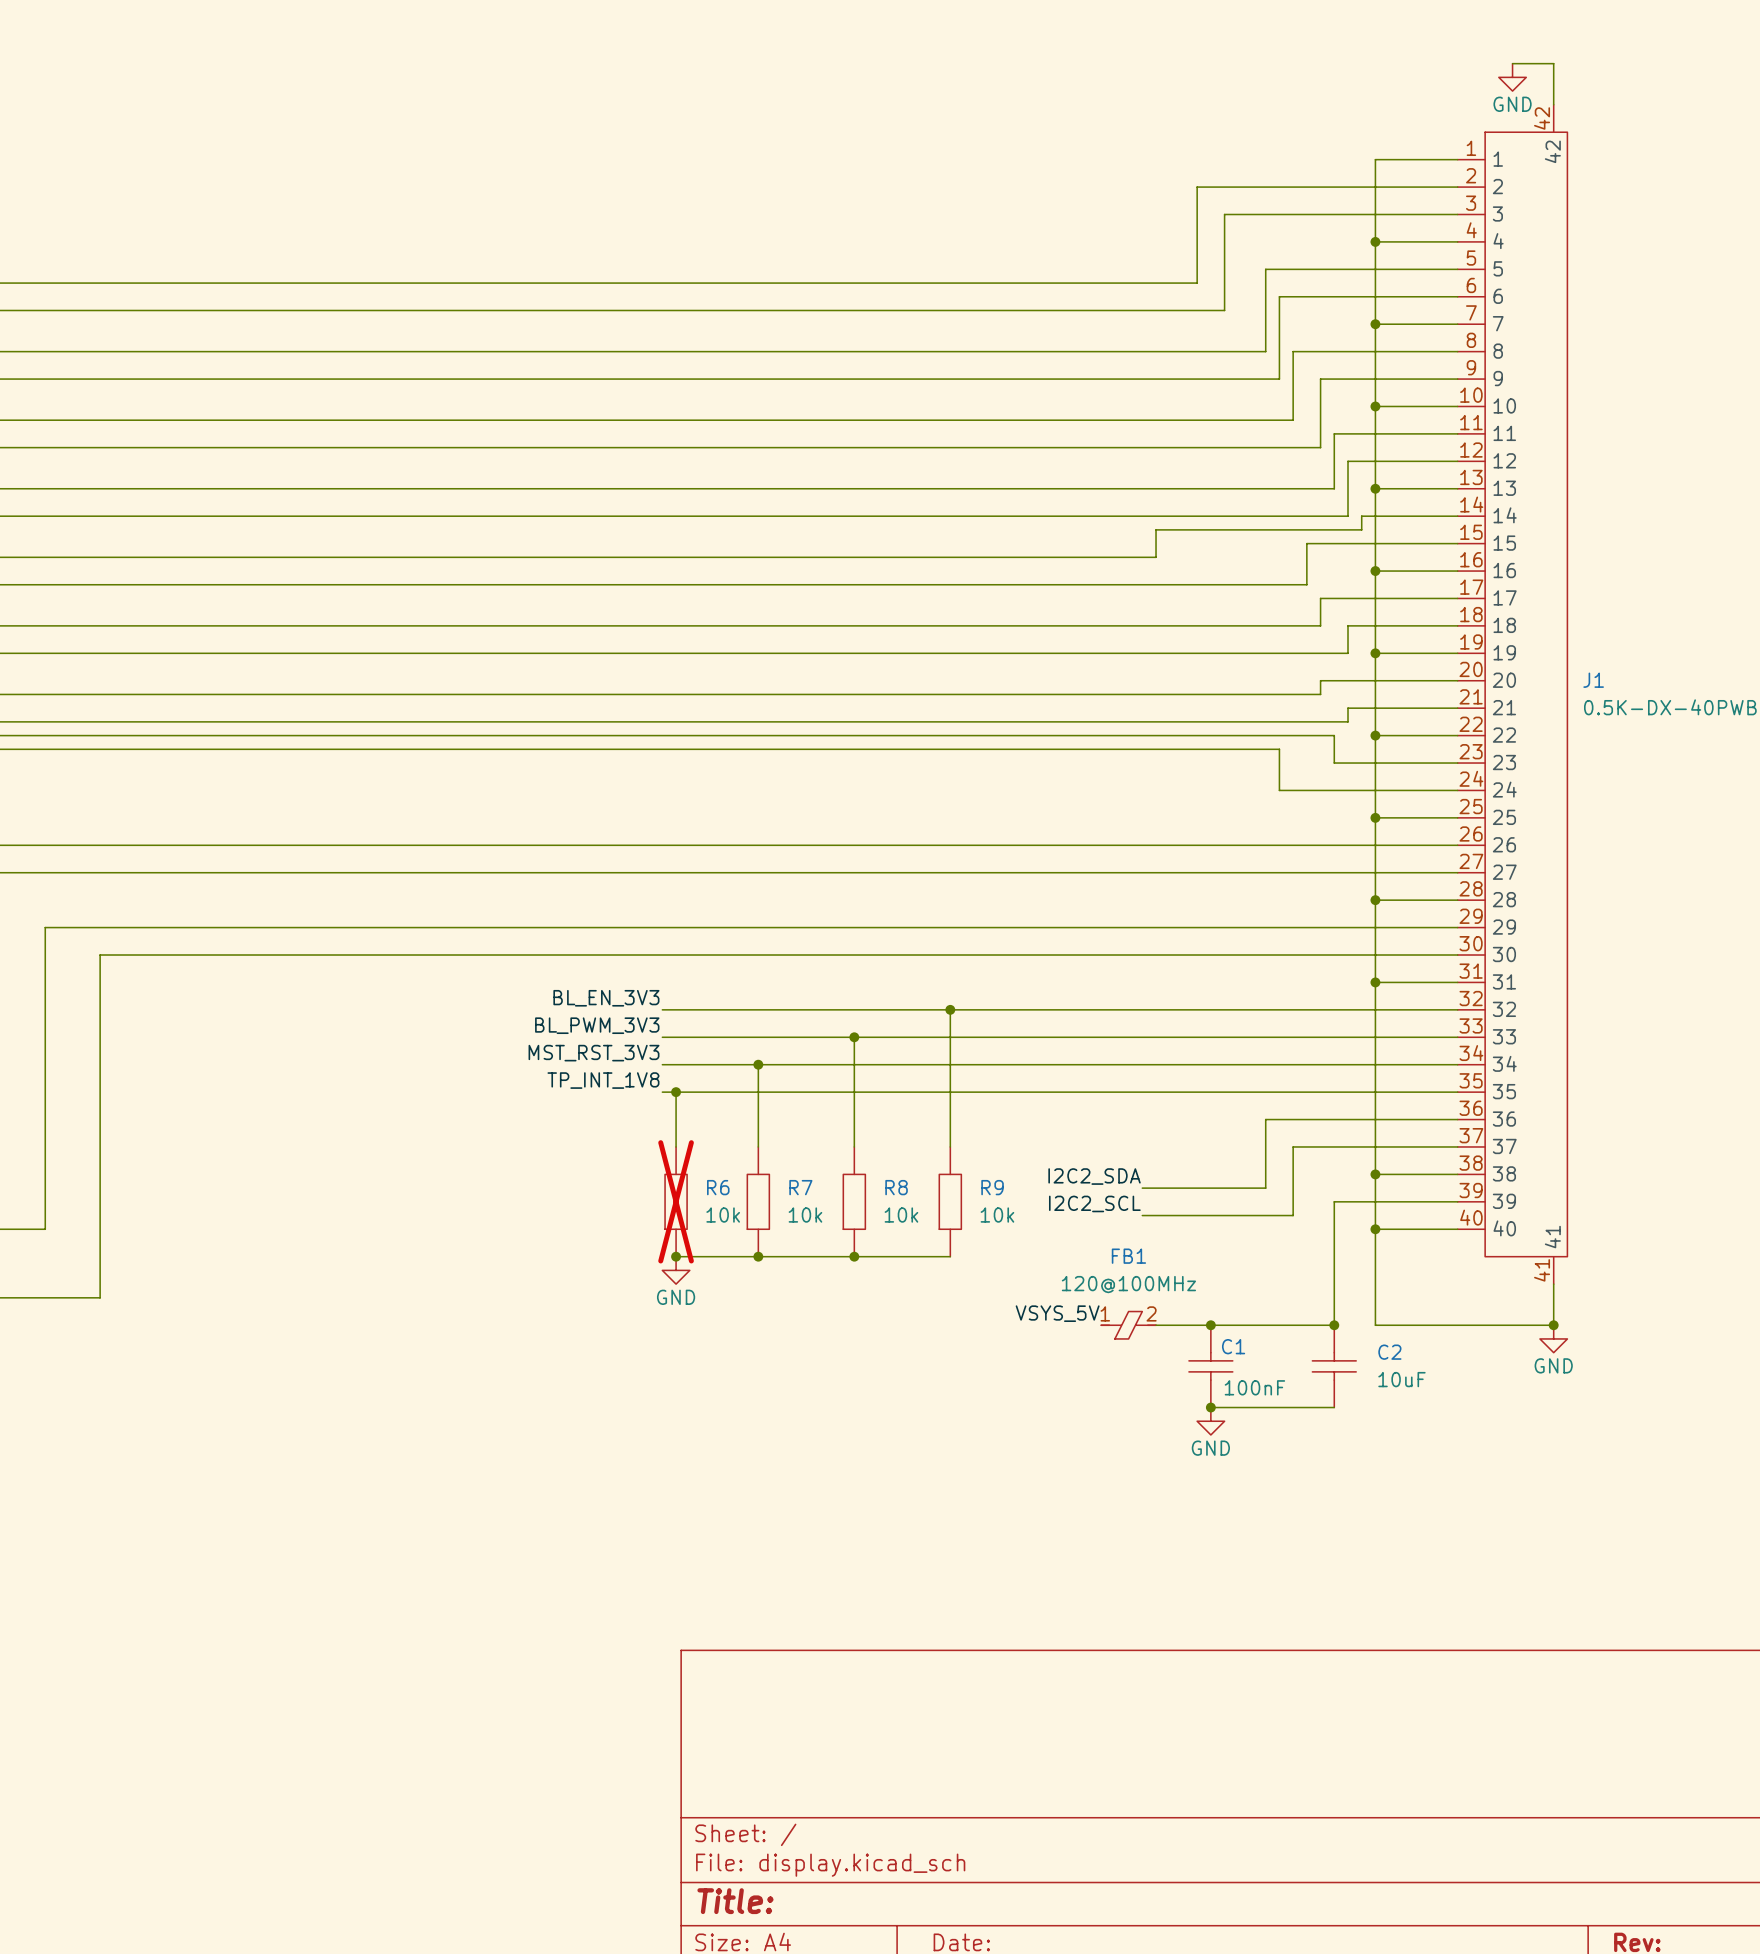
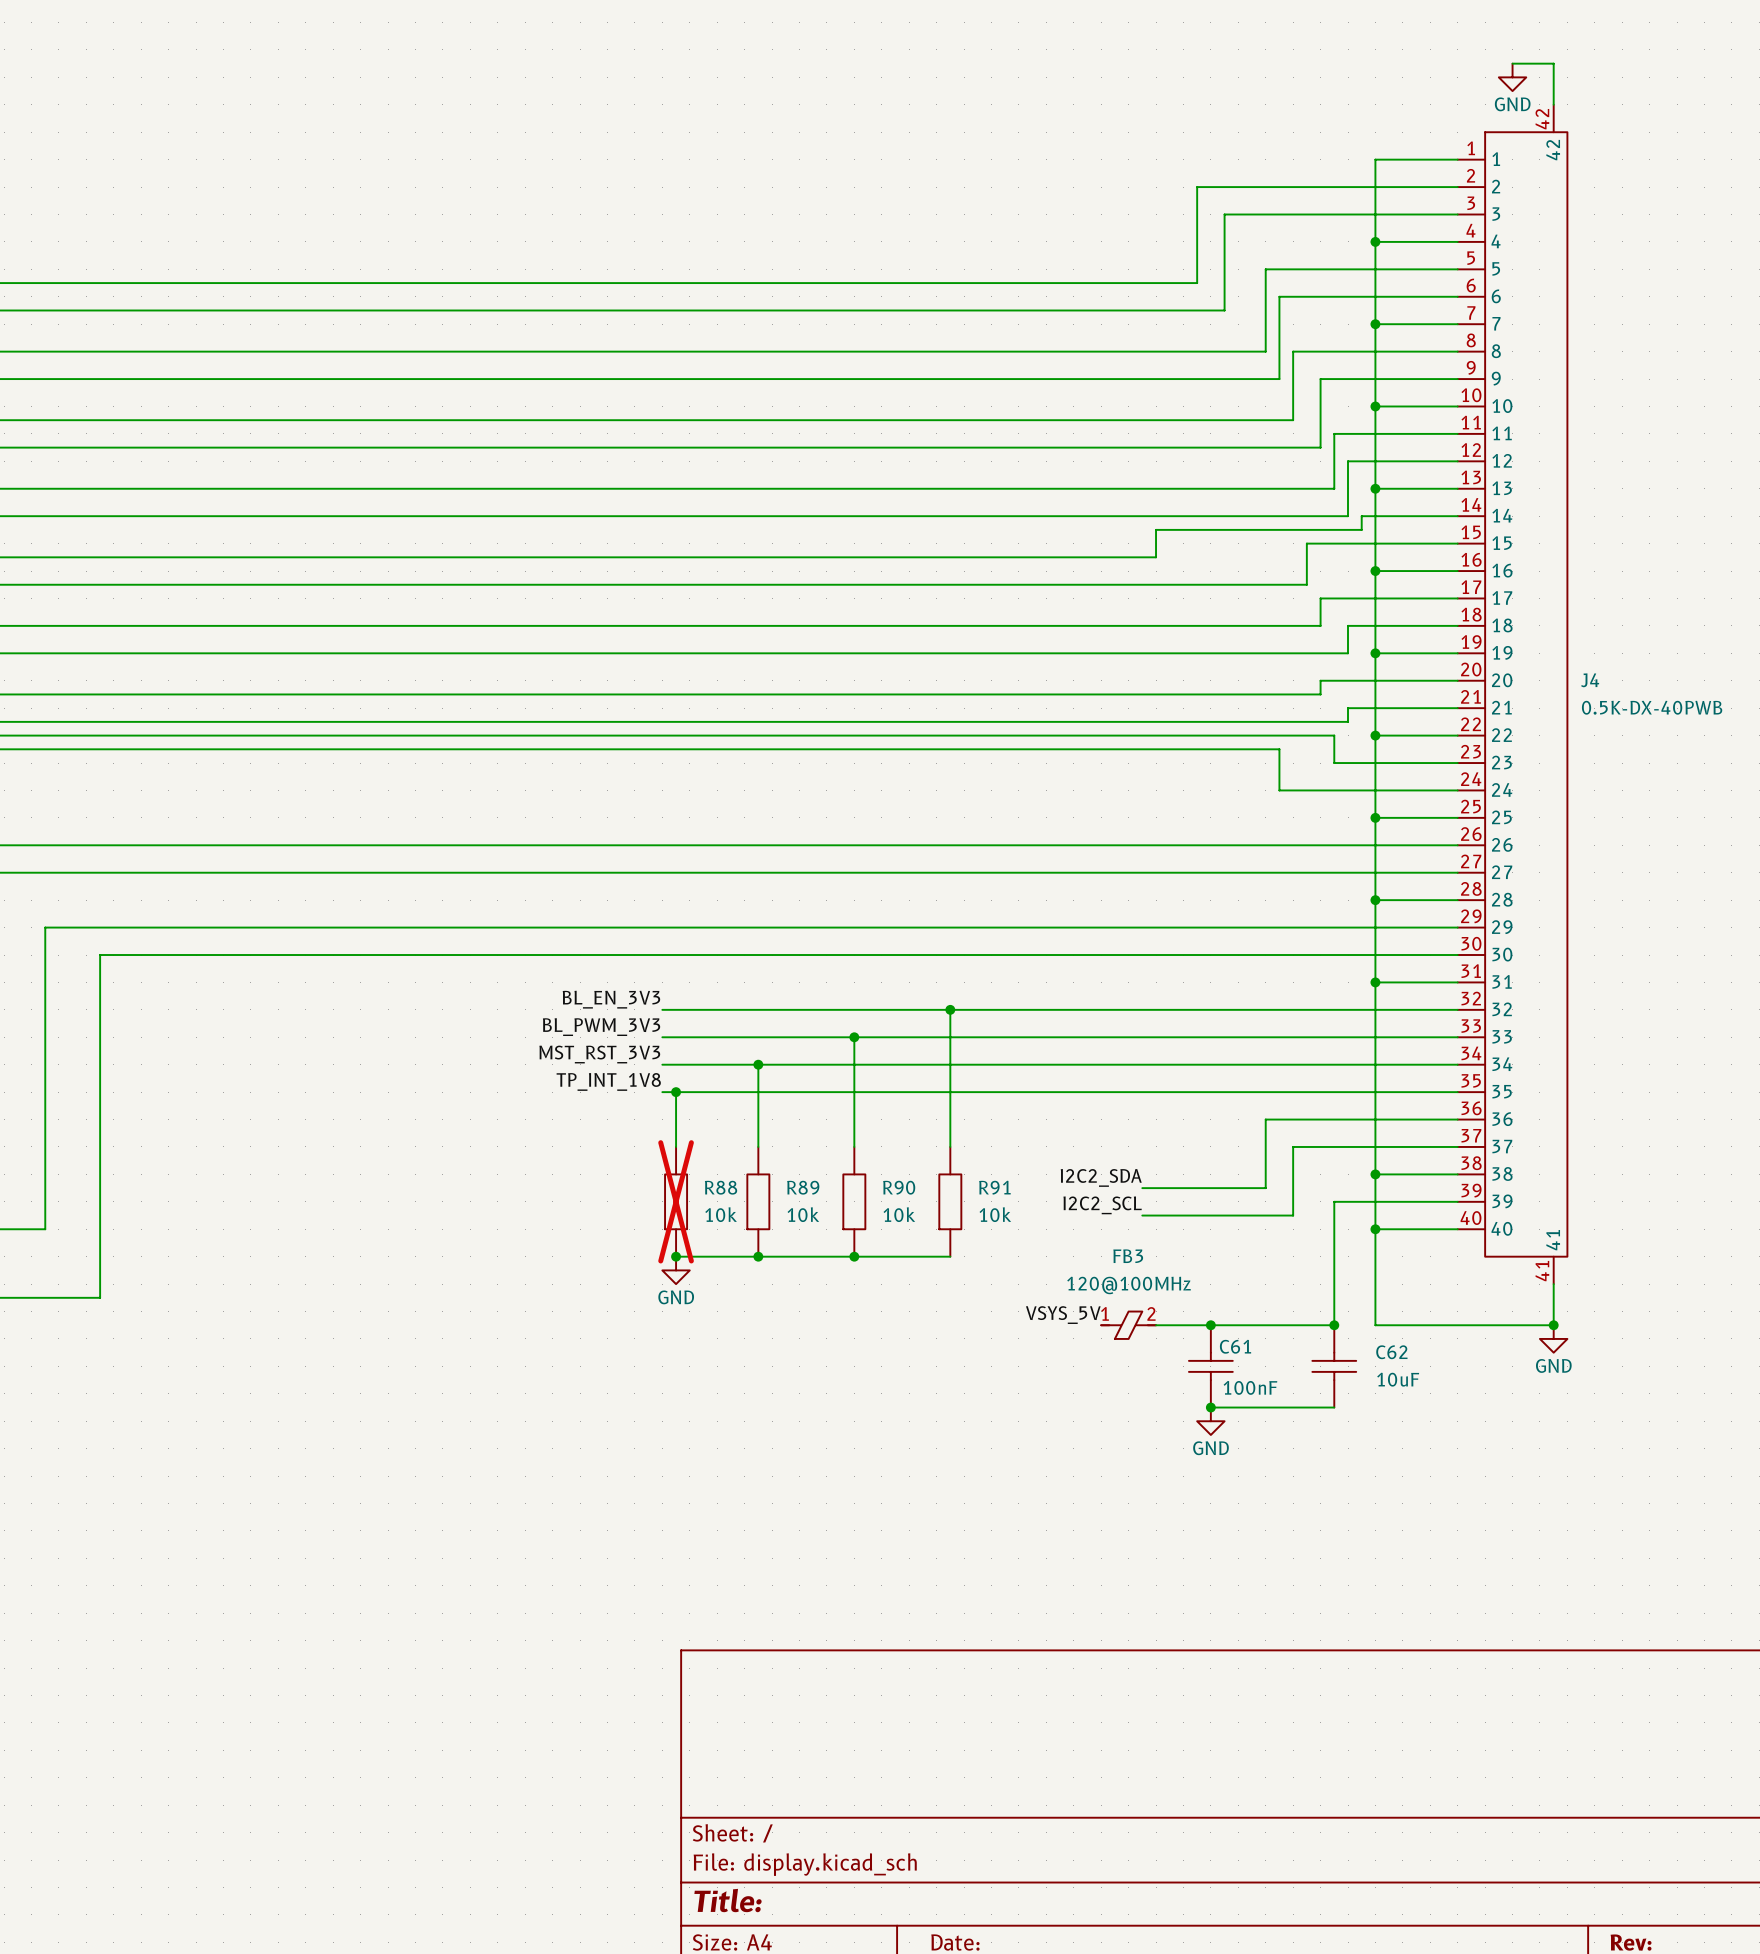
J1 name: J1 (1593, 680) -> J4 (1590, 680)
R6 name: R6 (718, 1187) -> R88 (721, 1187)
R7 name: R7 (800, 1187) -> R89 (803, 1187)
R8 name: R8 (896, 1187) -> R90 (899, 1187)
R9 name: R9 (992, 1187) -> R91 (994, 1187)
FB1 name: FB1 (1128, 1256) -> FB3 (1128, 1256)
C1 name: C1 (1233, 1346) -> C61 (1235, 1346)
C2 name: C2 (1389, 1352) -> C62 (1391, 1352)

